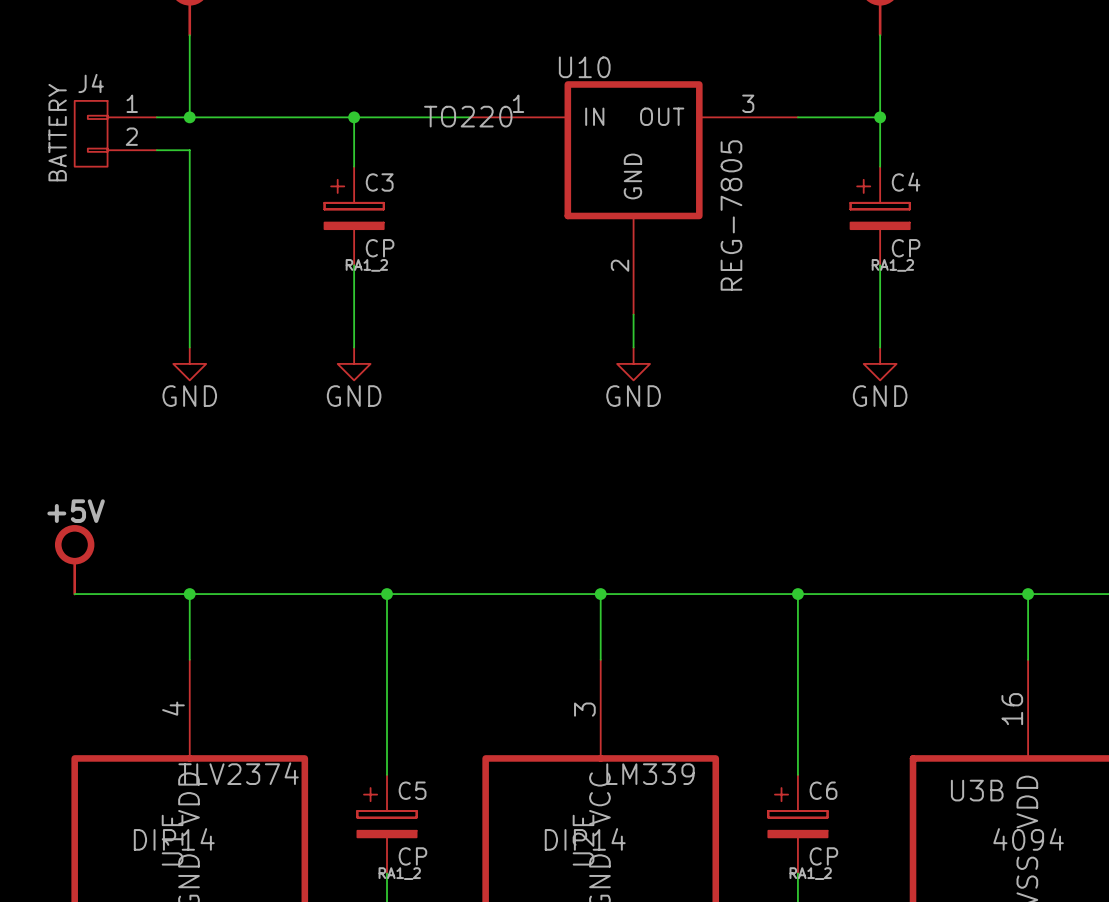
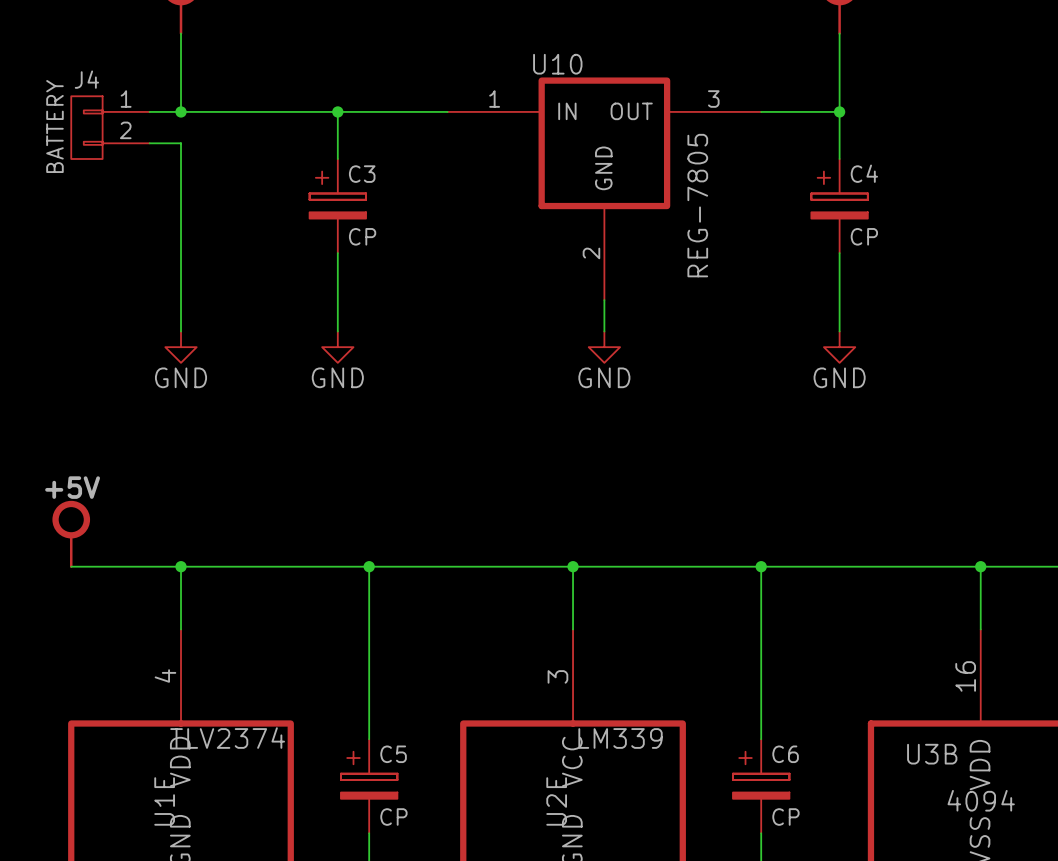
U10 text: TO220 (468, 116) -> none
C3 text: RA1_2 (366, 265) -> none
C4 text: RA1_2 (892, 265) -> none
U1E text: DIP14 (174, 839) -> none
U2E text: DIP14 (585, 839) -> none
C5 text: RA1_2 (399, 873) -> none
C6 text: RA1_2 (810, 873) -> none

